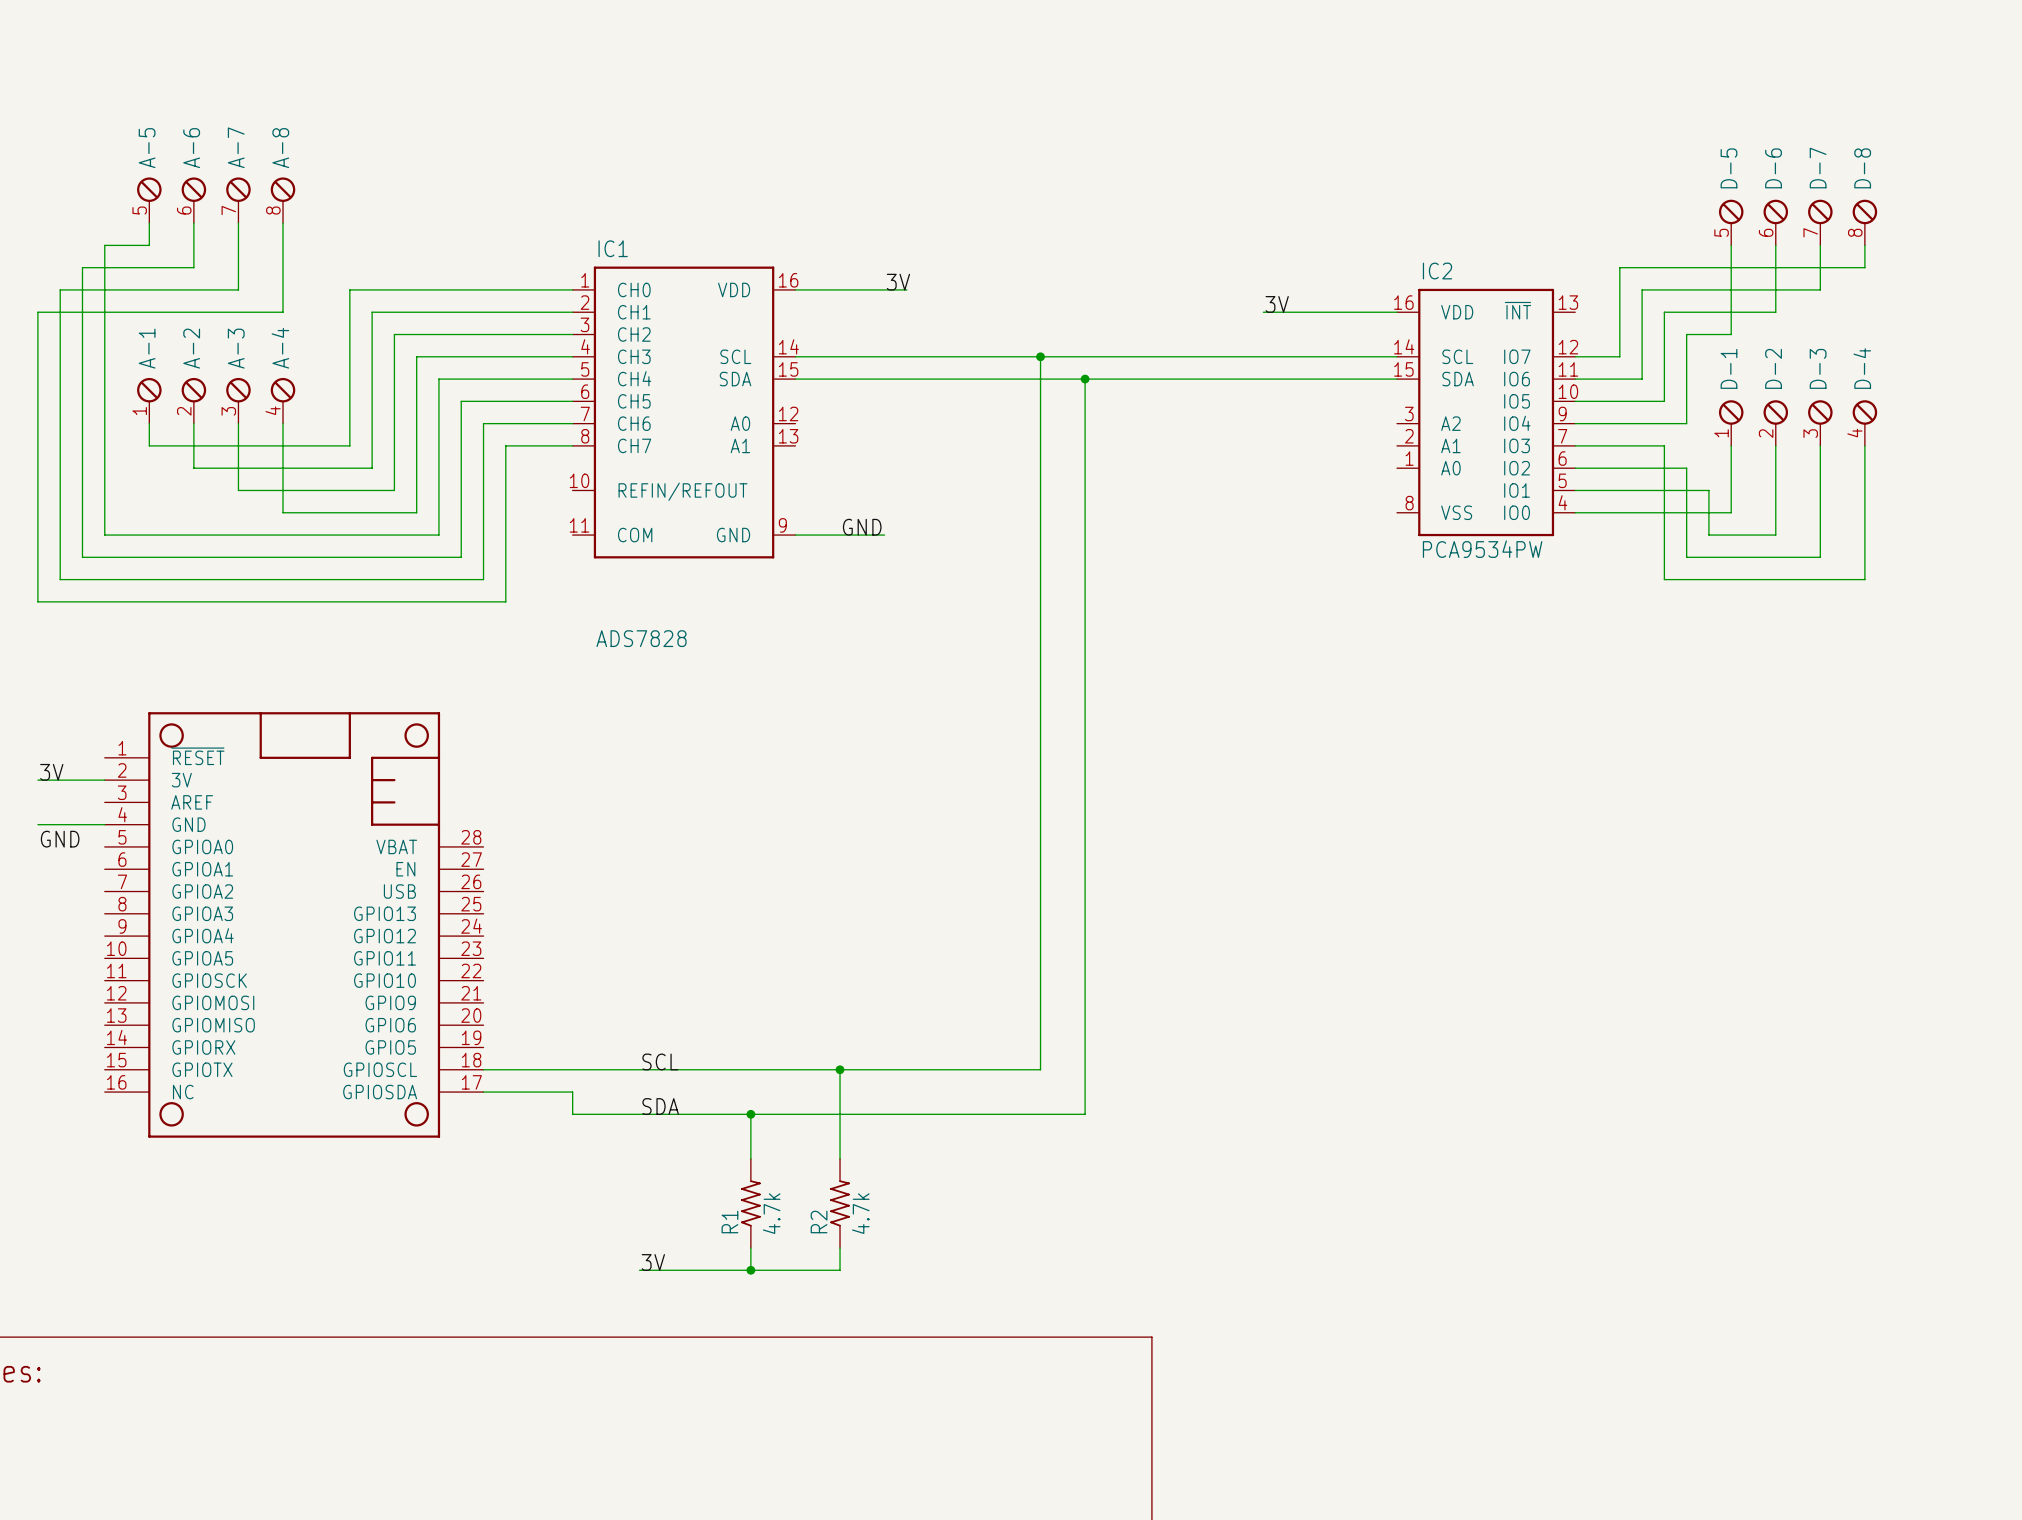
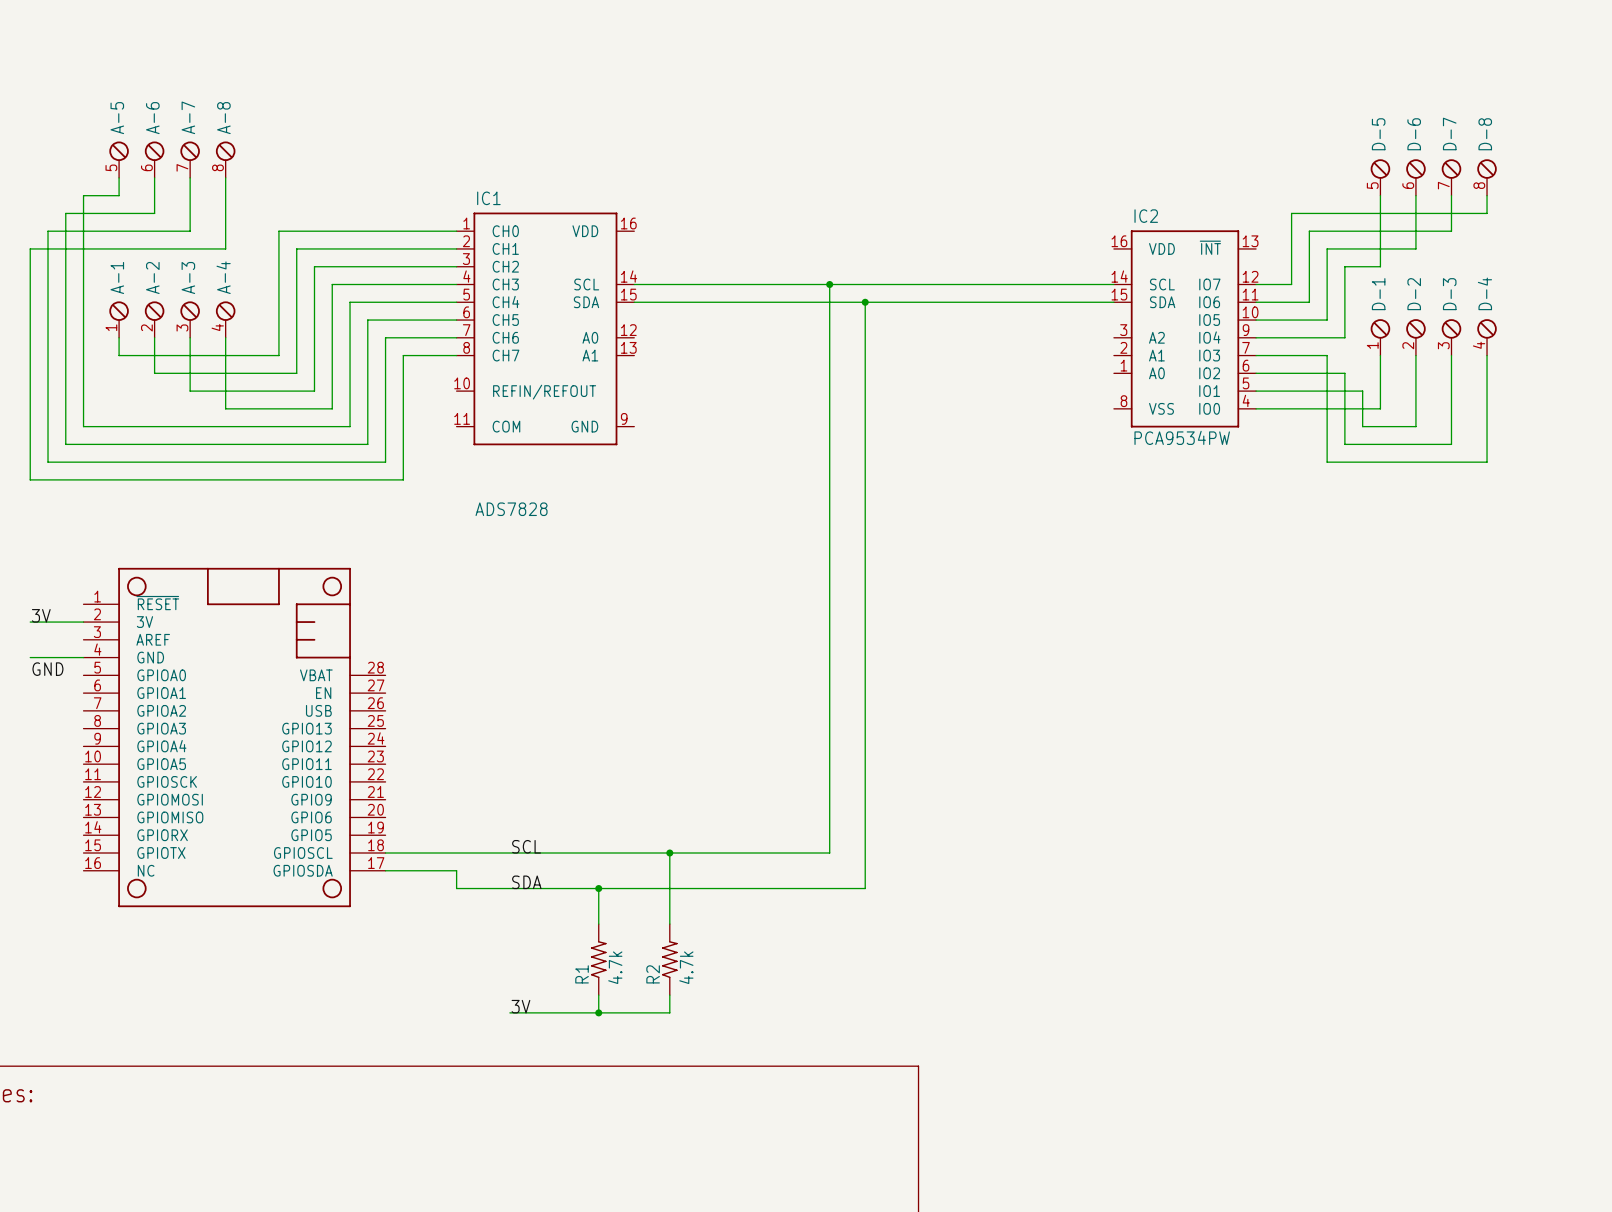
label: 3V (898, 282) -> none
wire: (795, 289) (906, 289) -> none
label: 3V (1277, 304) -> none
wire: (1263, 312) (1397, 312) -> none
label: GND (862, 527) -> none
wire: (795, 535) (884, 535) -> none

